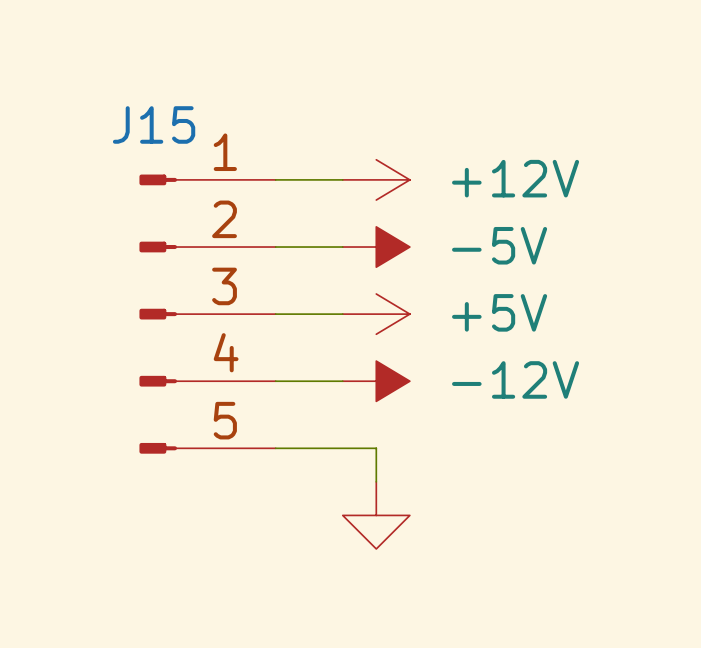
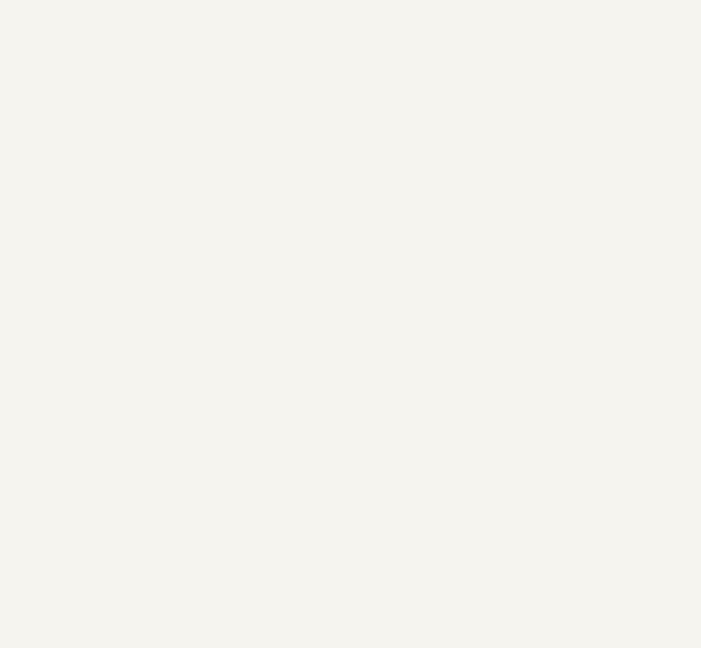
wire: (275, 179) (342, 179) -> none
power symbol: +12V (376, 179) -> none
wire: (275, 247) (342, 247) -> none
power symbol: -5V (376, 247) -> none
J15: (207, 314) -> none
wire: (275, 314) (342, 314) -> none
power symbol: +5V (376, 314) -> none
wire: (275, 381) (342, 381) -> none
power symbol: -12V (376, 381) -> none
wire: (275, 448) (376, 448) (376, 481) -> none
power symbol: (376, 515) -> none

